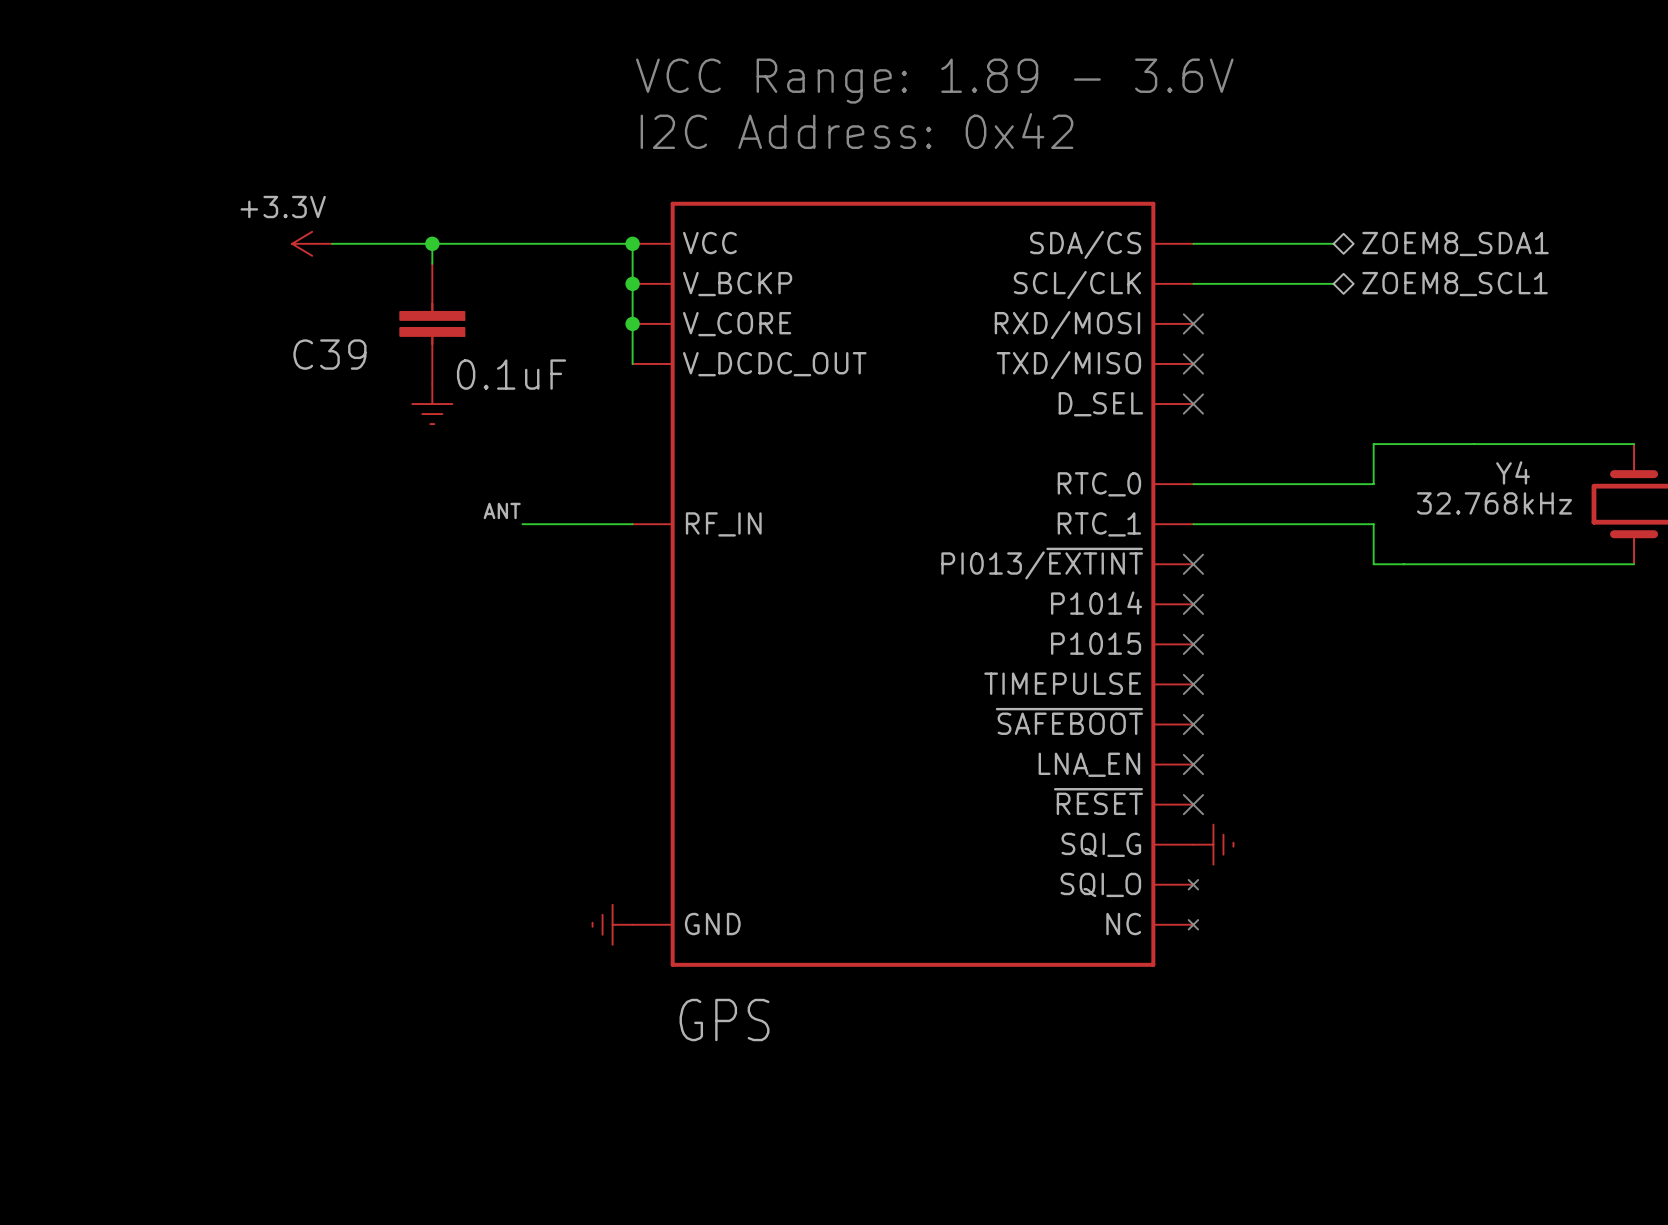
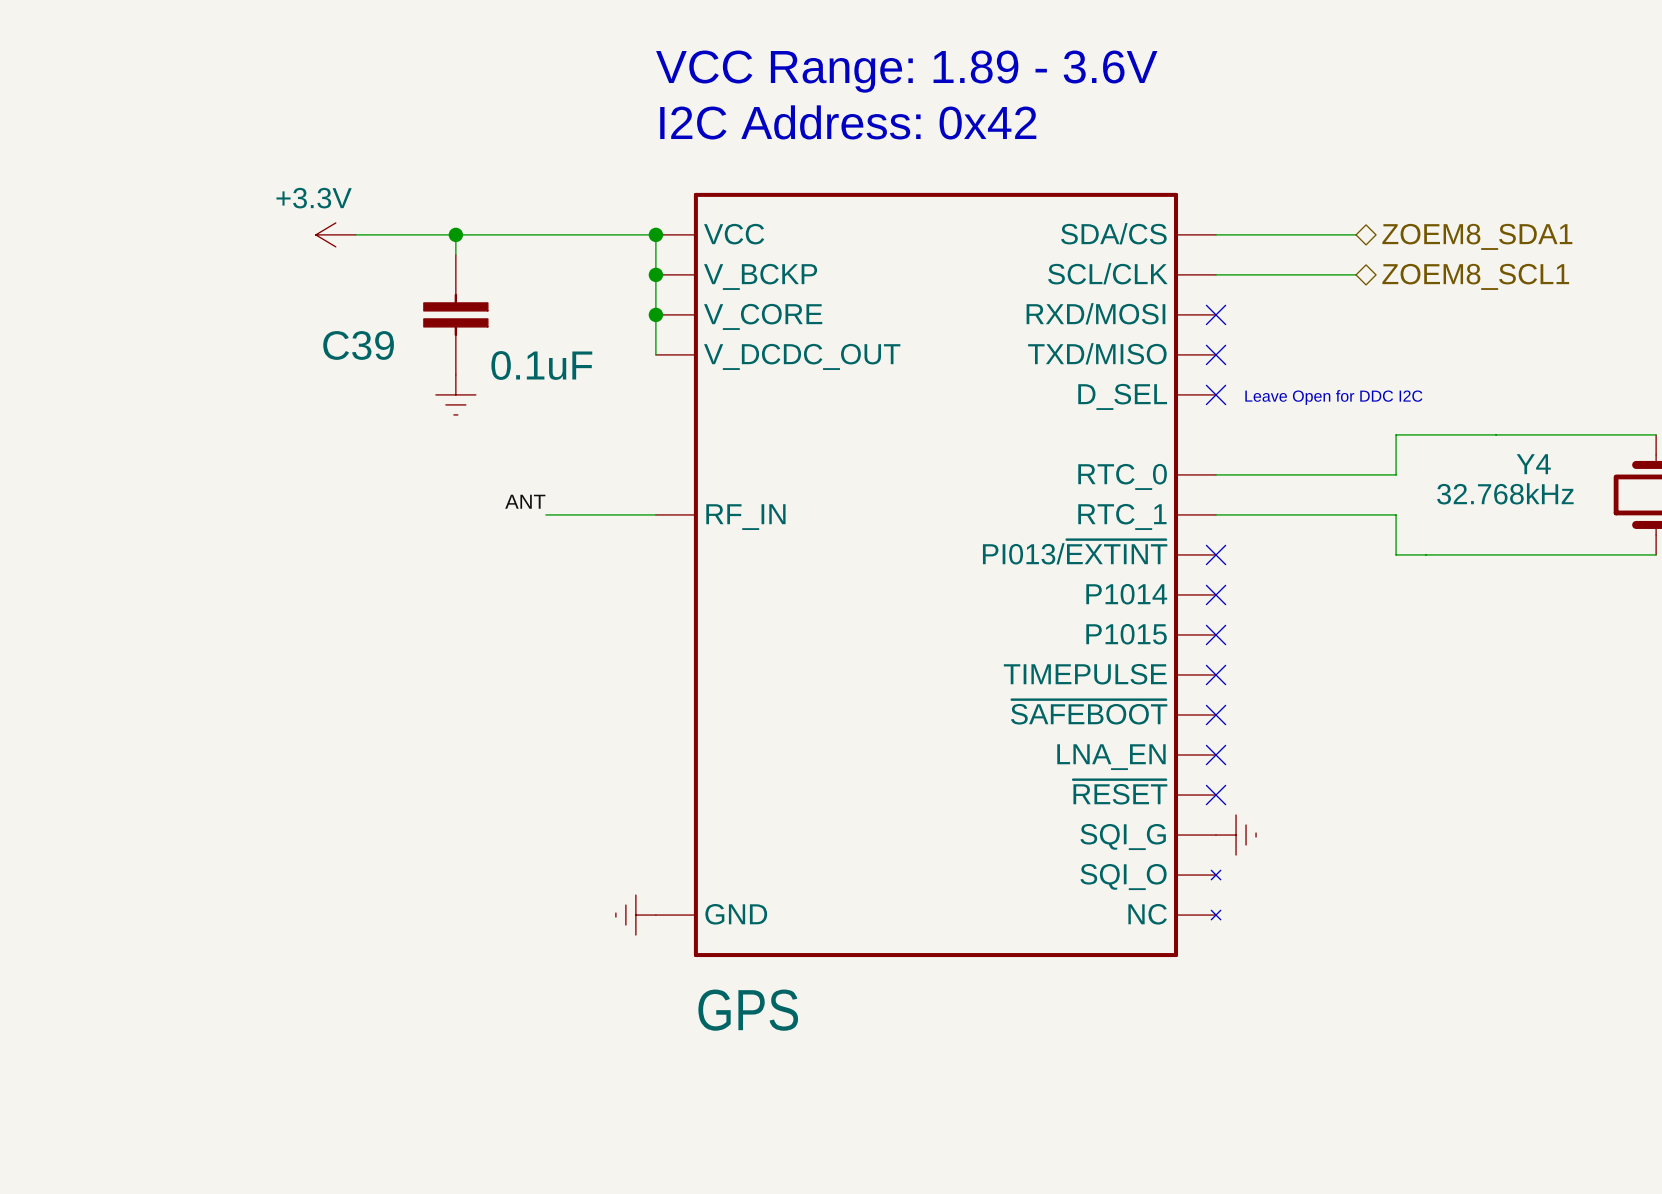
text: none -> Leave Open for DDC I2C (1333, 397)

